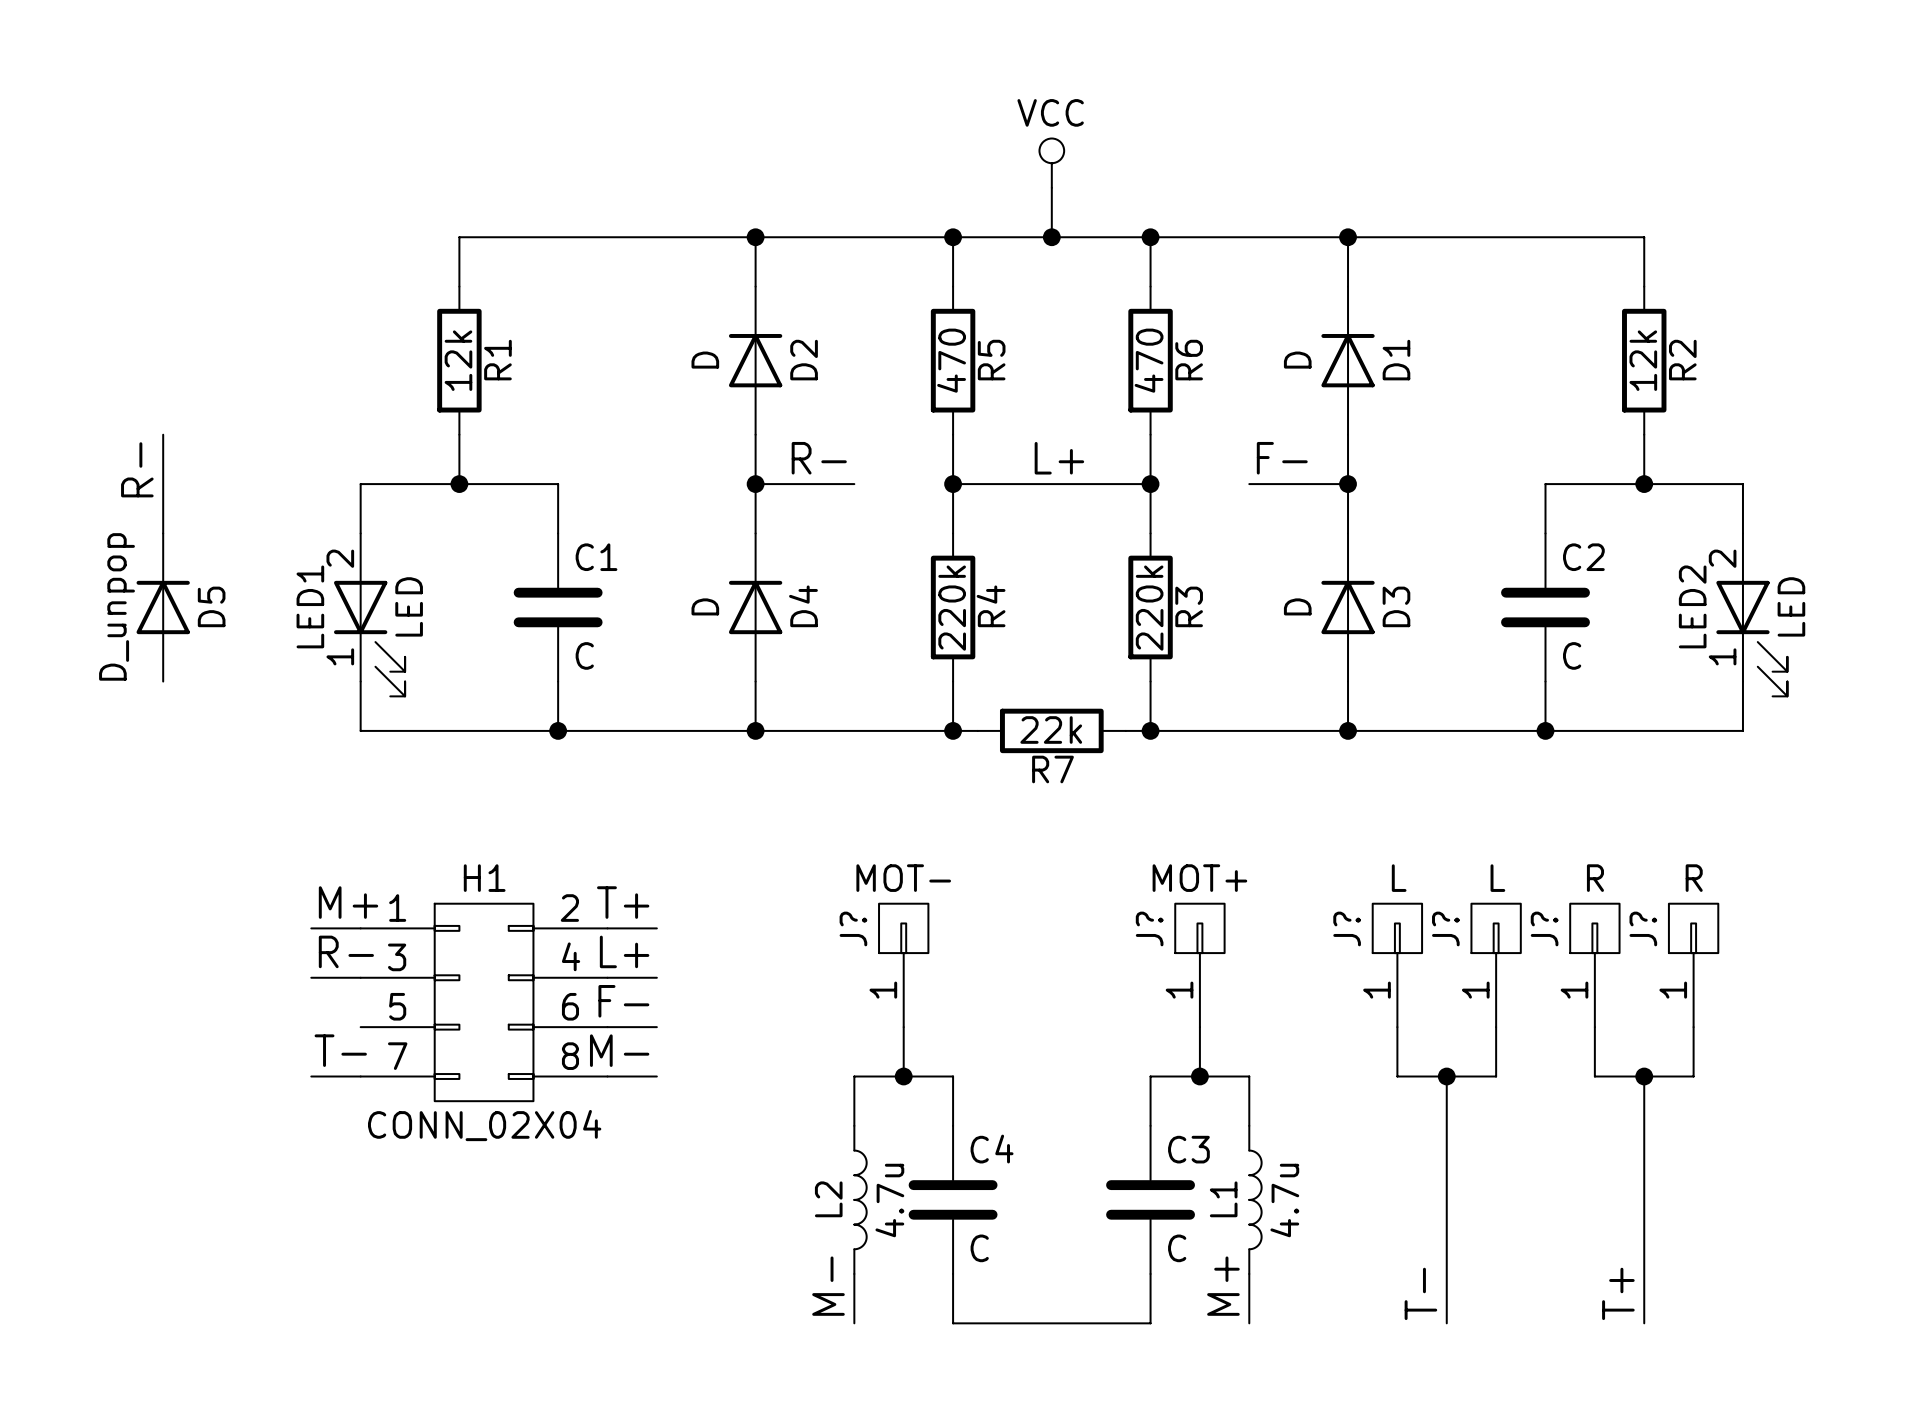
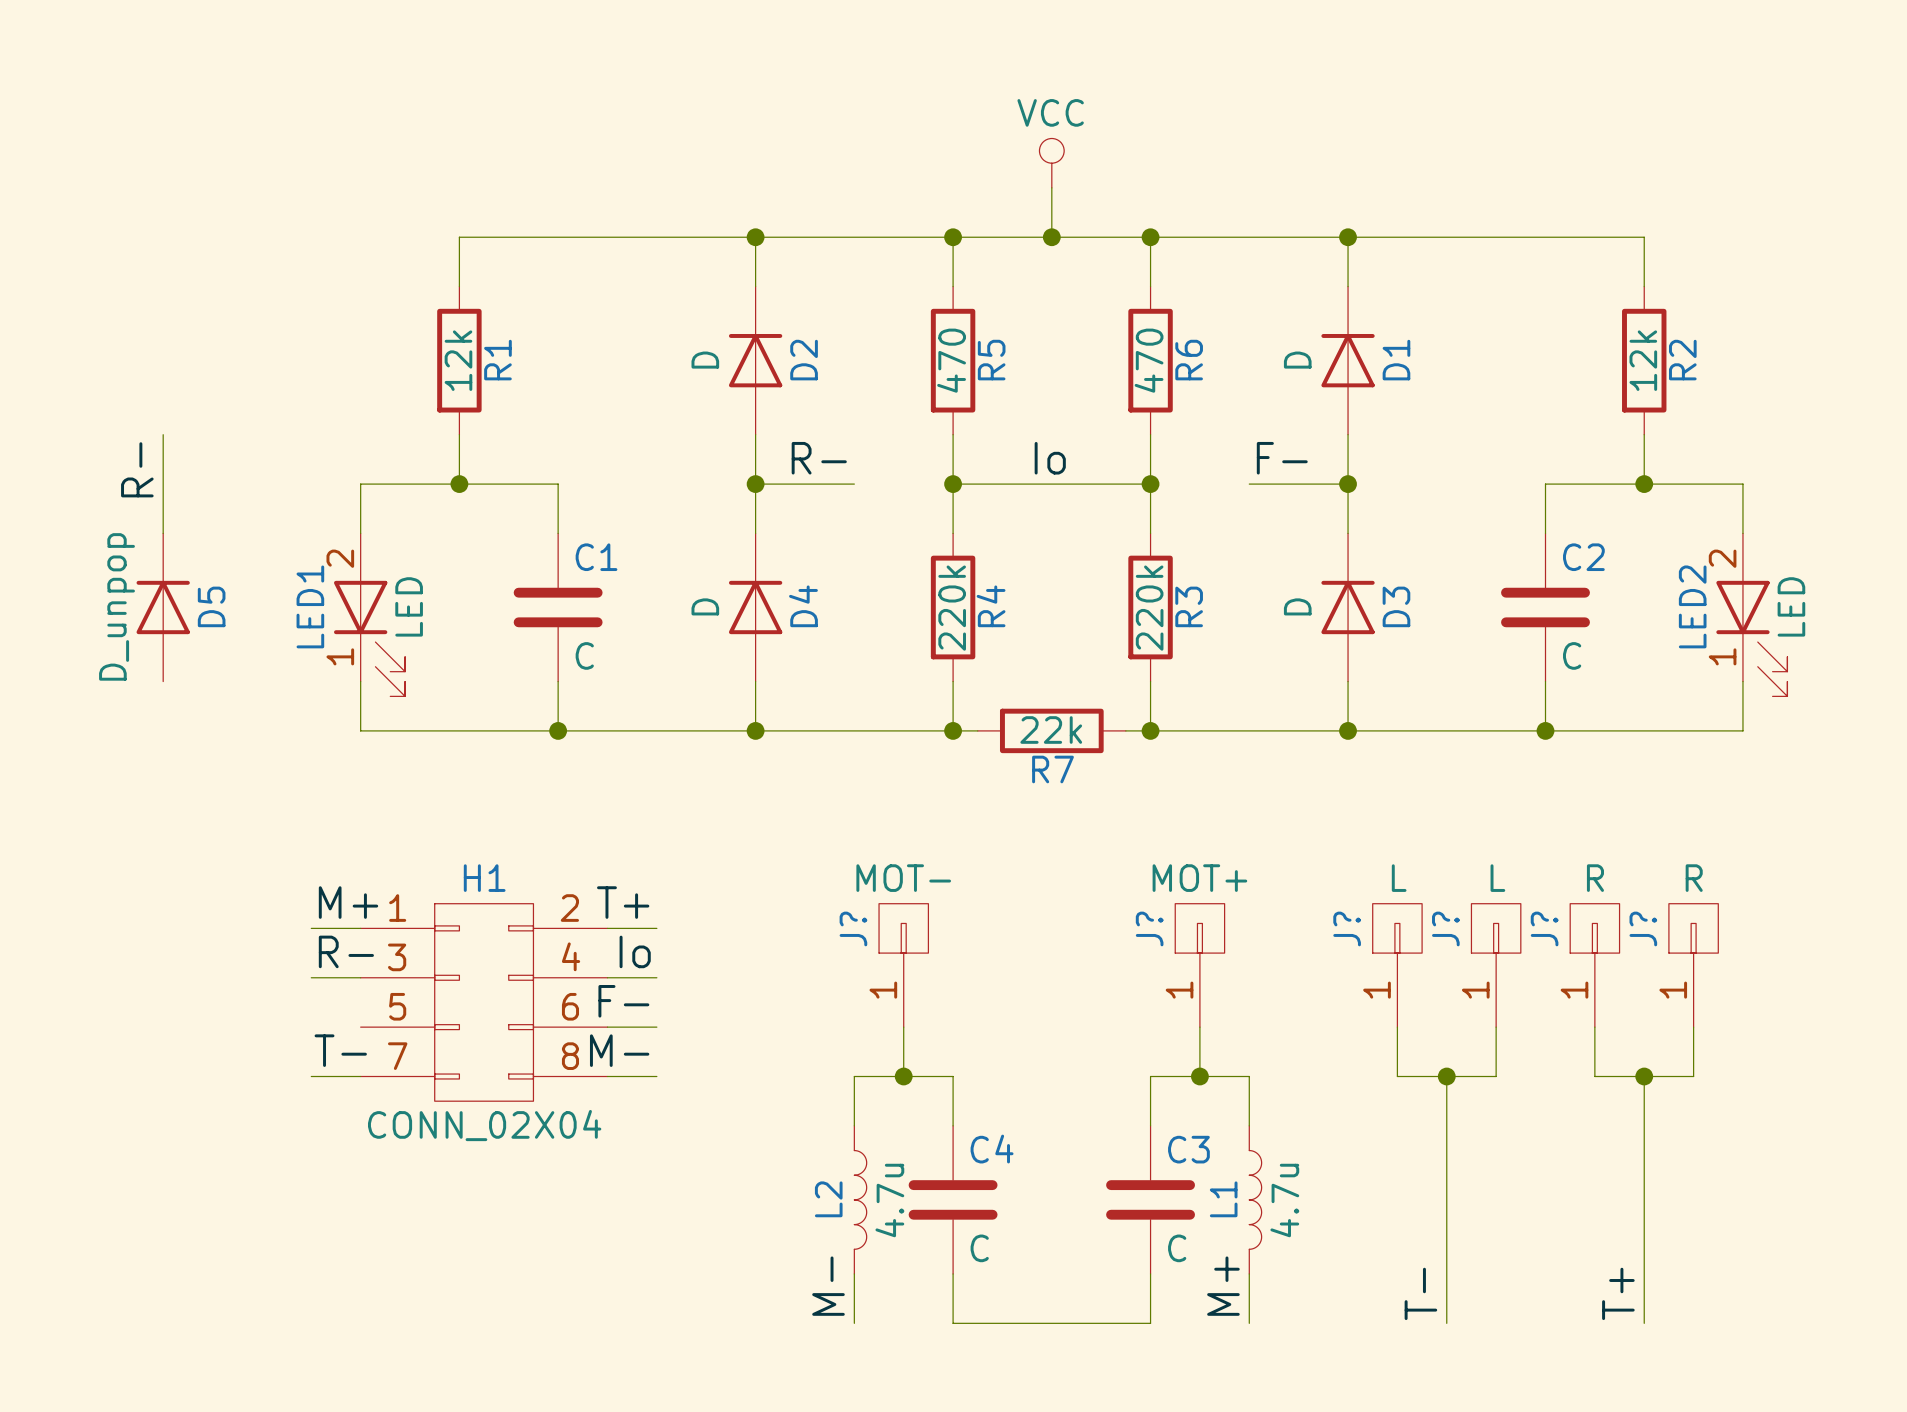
label: L+ (1059, 458) -> Io (1050, 458)
label: L+ (624, 951) -> Io (635, 951)

